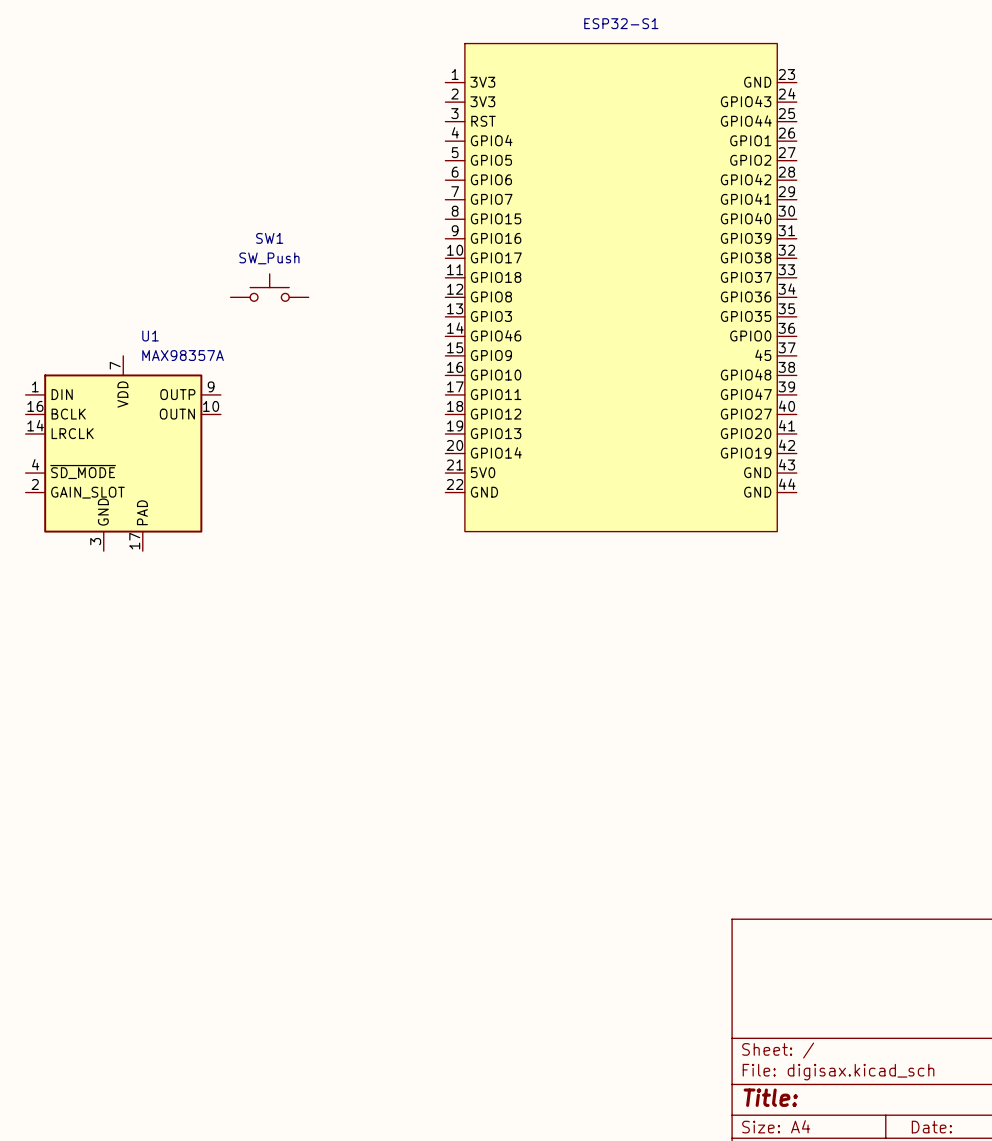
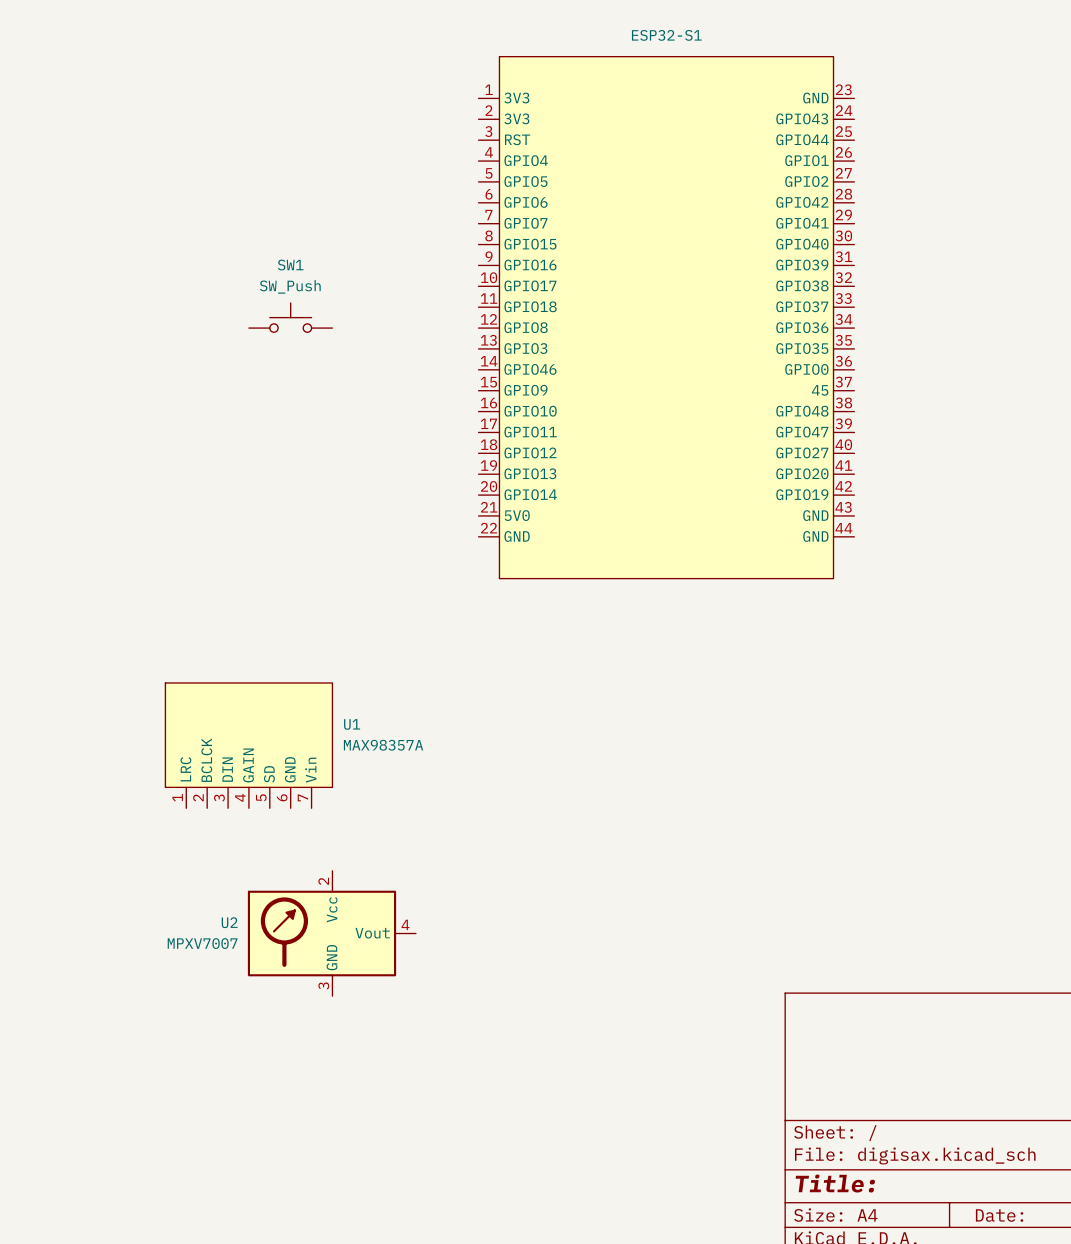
U1 name position: U1 (150, 336) -> U1 (352, 724)
U1 symbol: [25, 355, 221, 552] -> [165, 682, 333, 809]
U1 value position: MAX98357A (183, 355) -> MAX98357A (383, 745)
U2: none -> MPXV7007 (331, 933)

